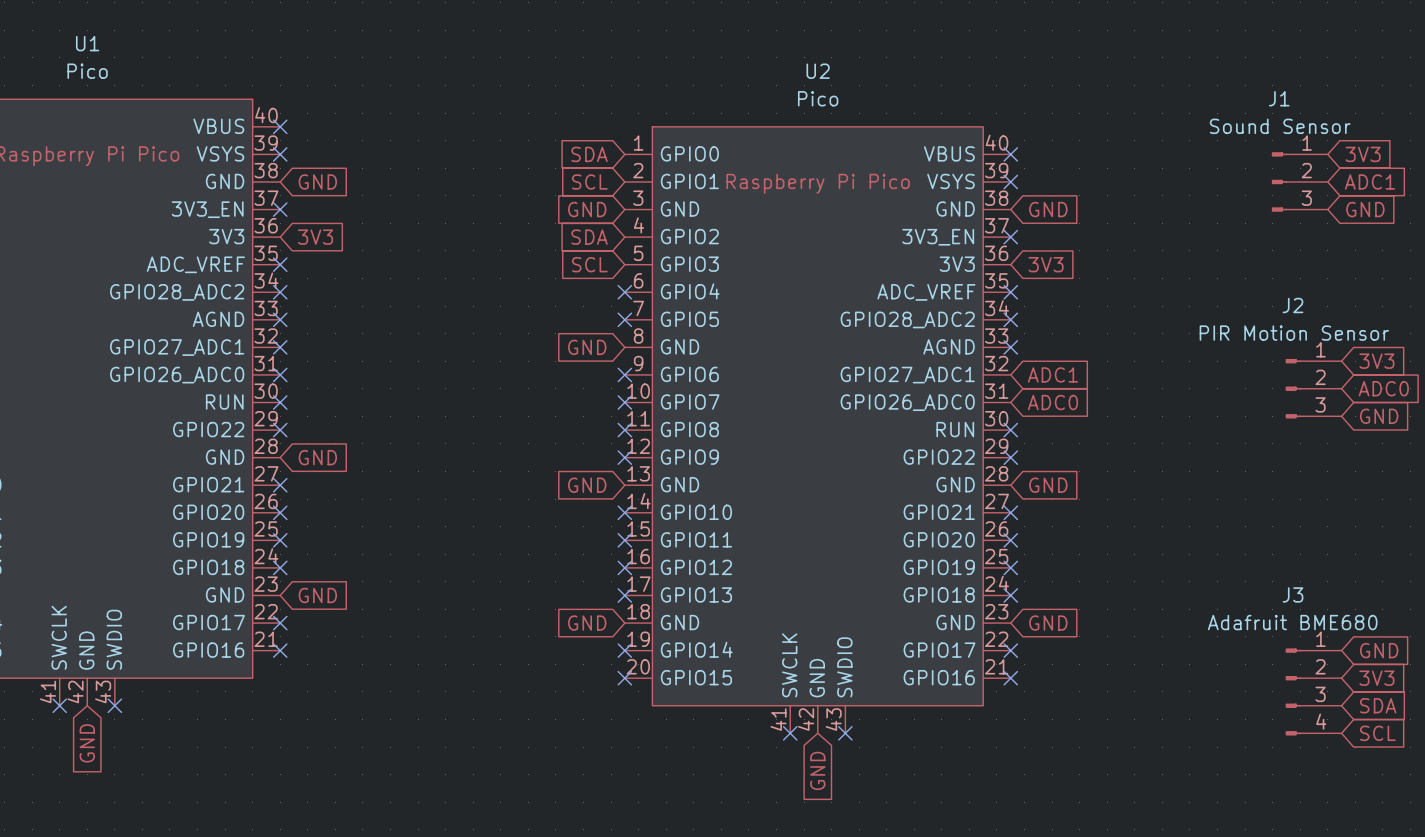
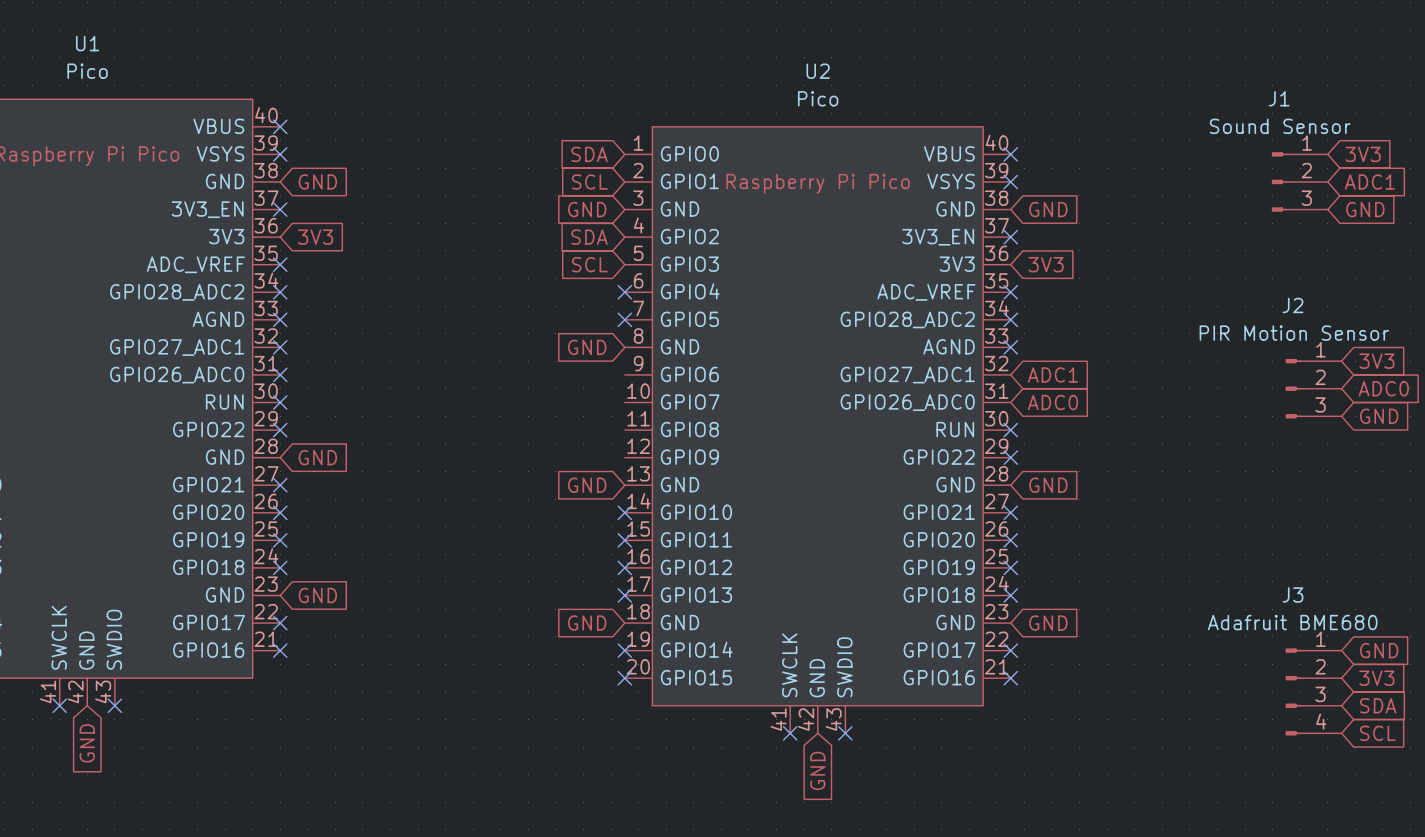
no-connect mark: (624, 374) -> none
no-connect mark: (624, 402) -> none
no-connect mark: (624, 430) -> none
no-connect mark: (624, 457) -> none

